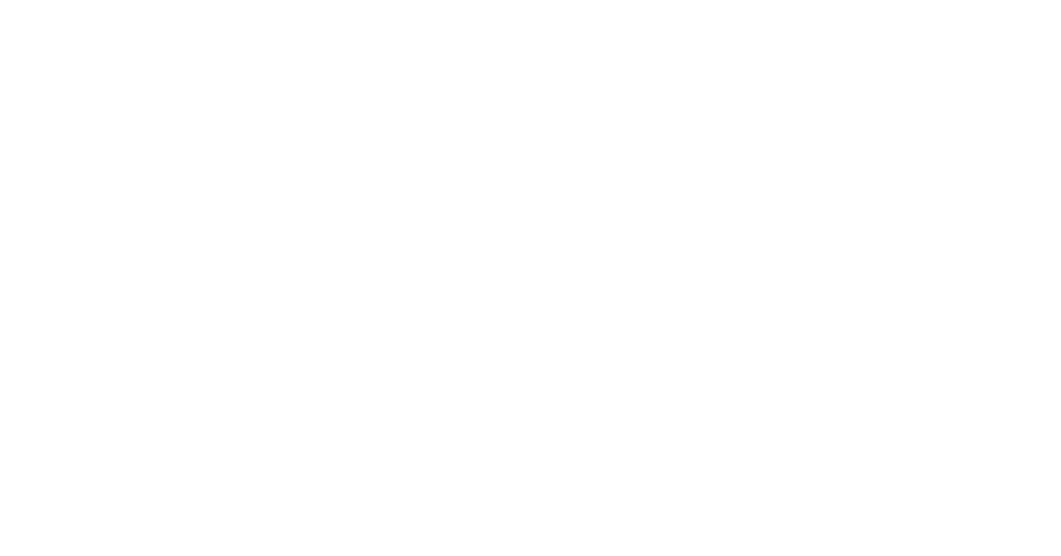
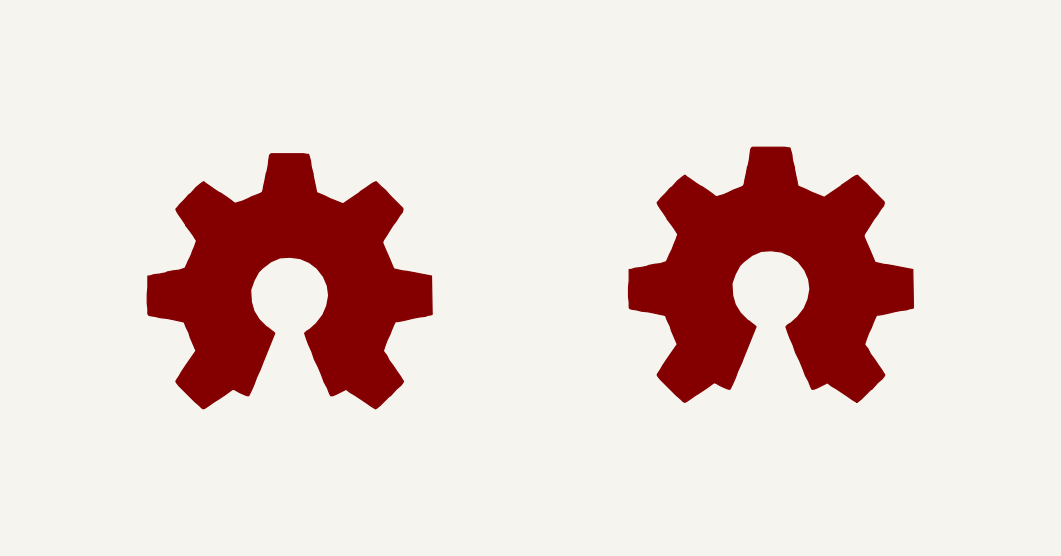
part: none -> (770, 274)
part: none -> (289, 281)

